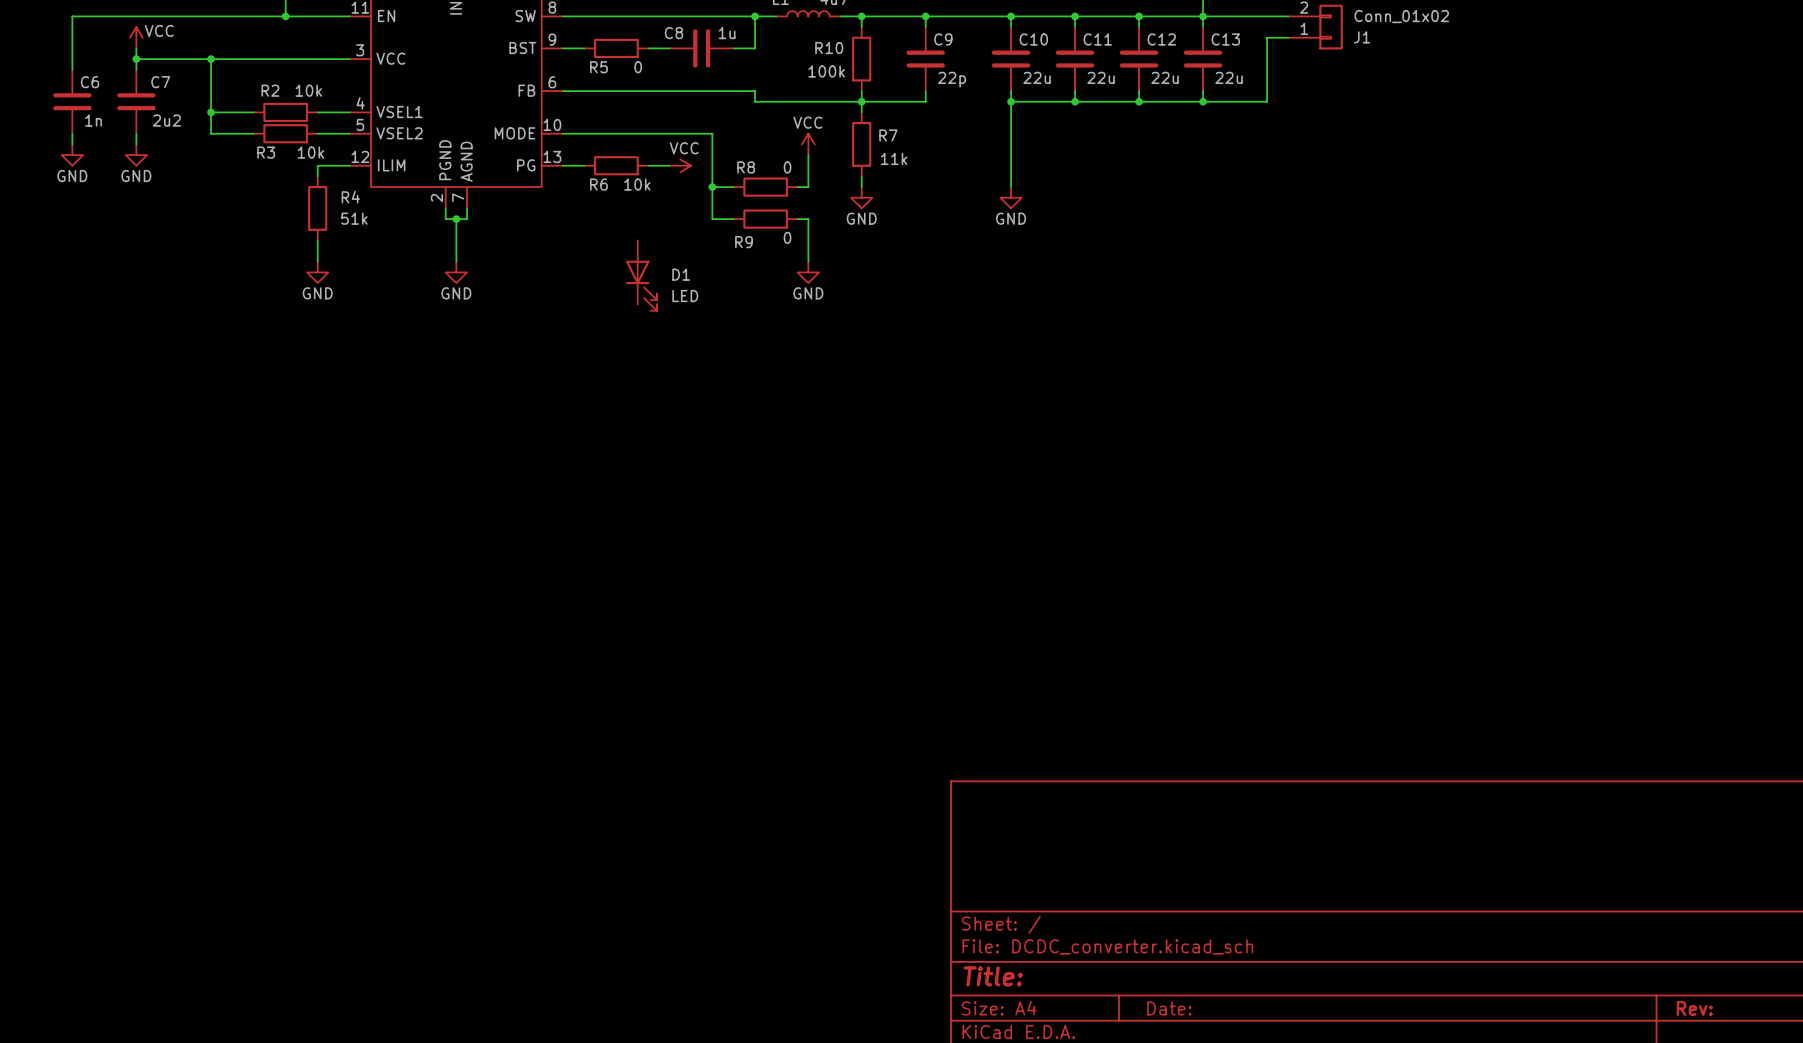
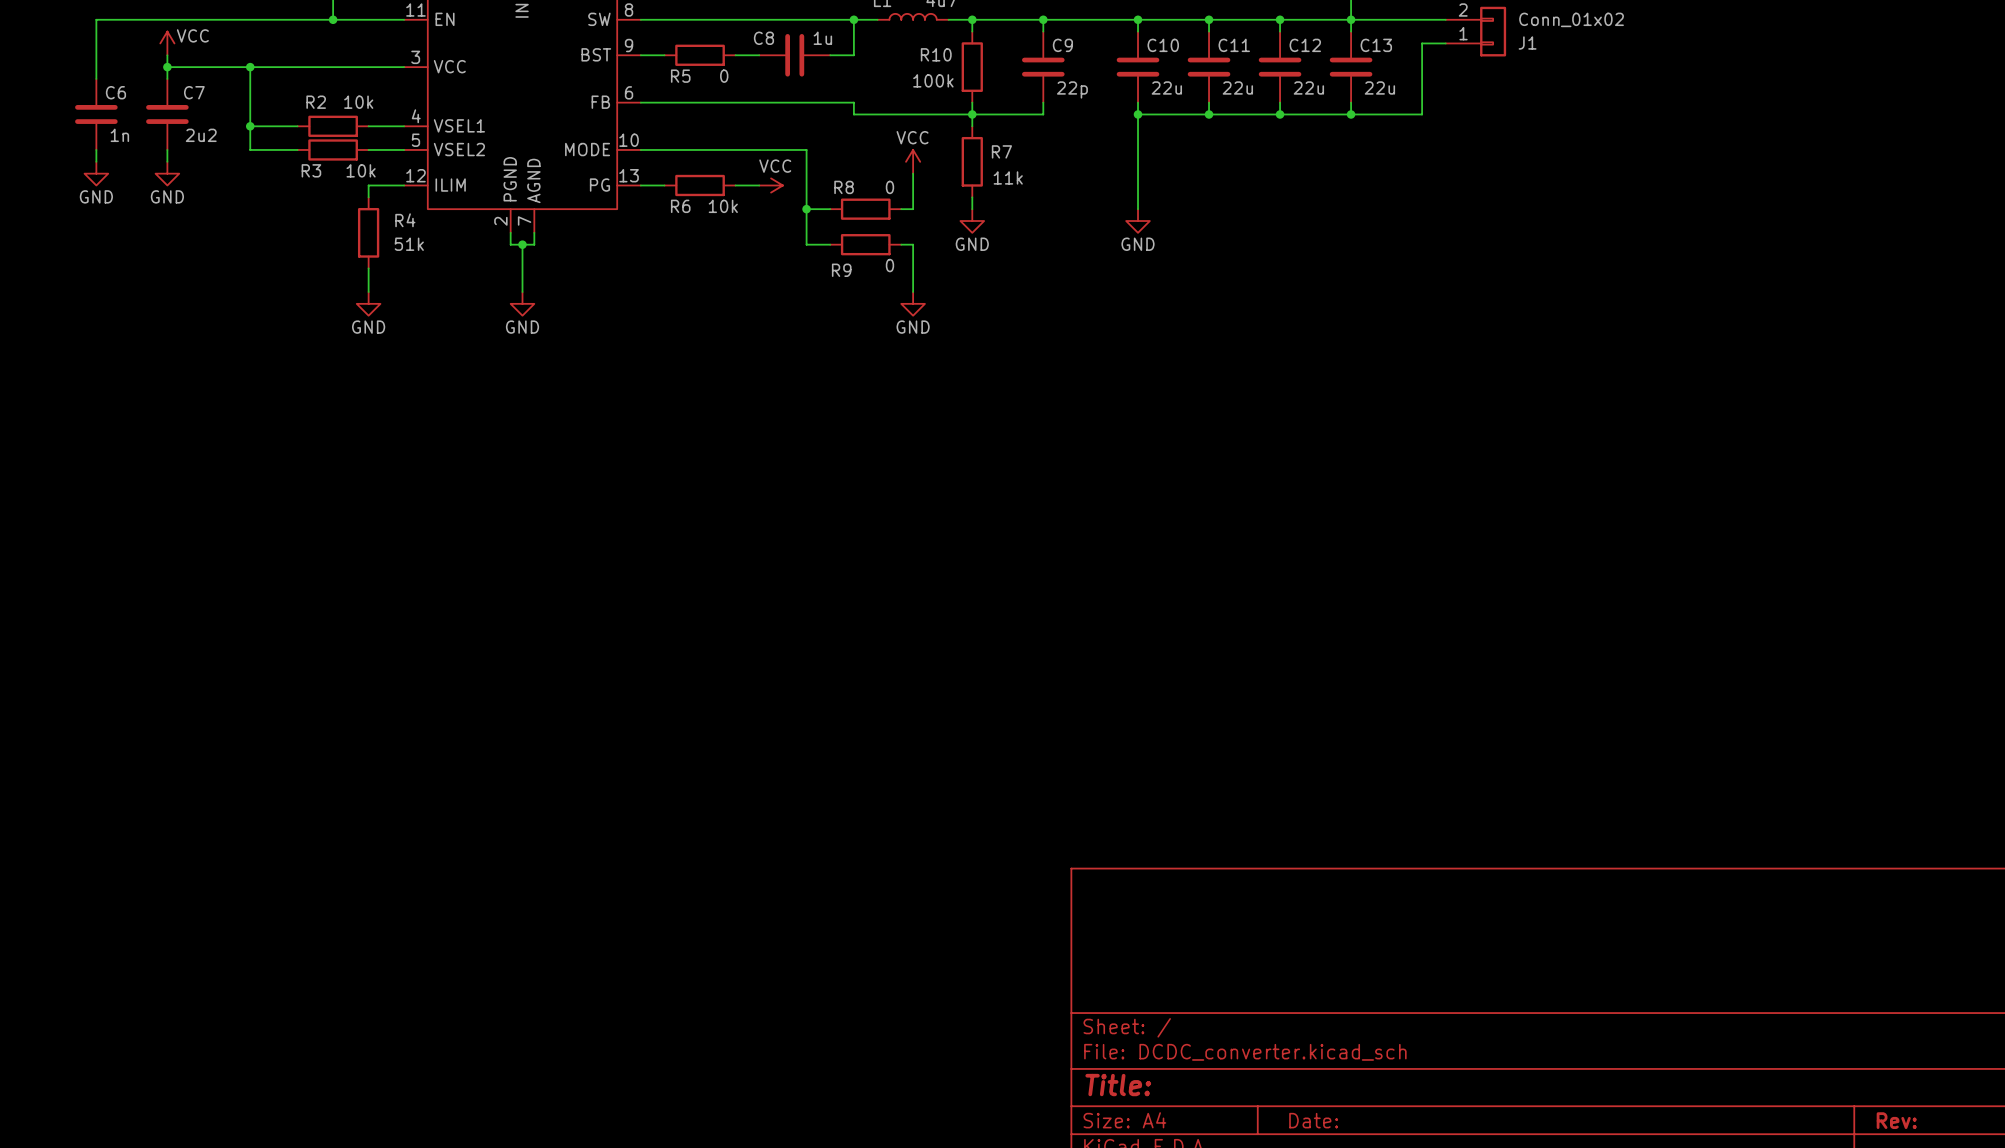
D1: LED (641, 275) -> none

